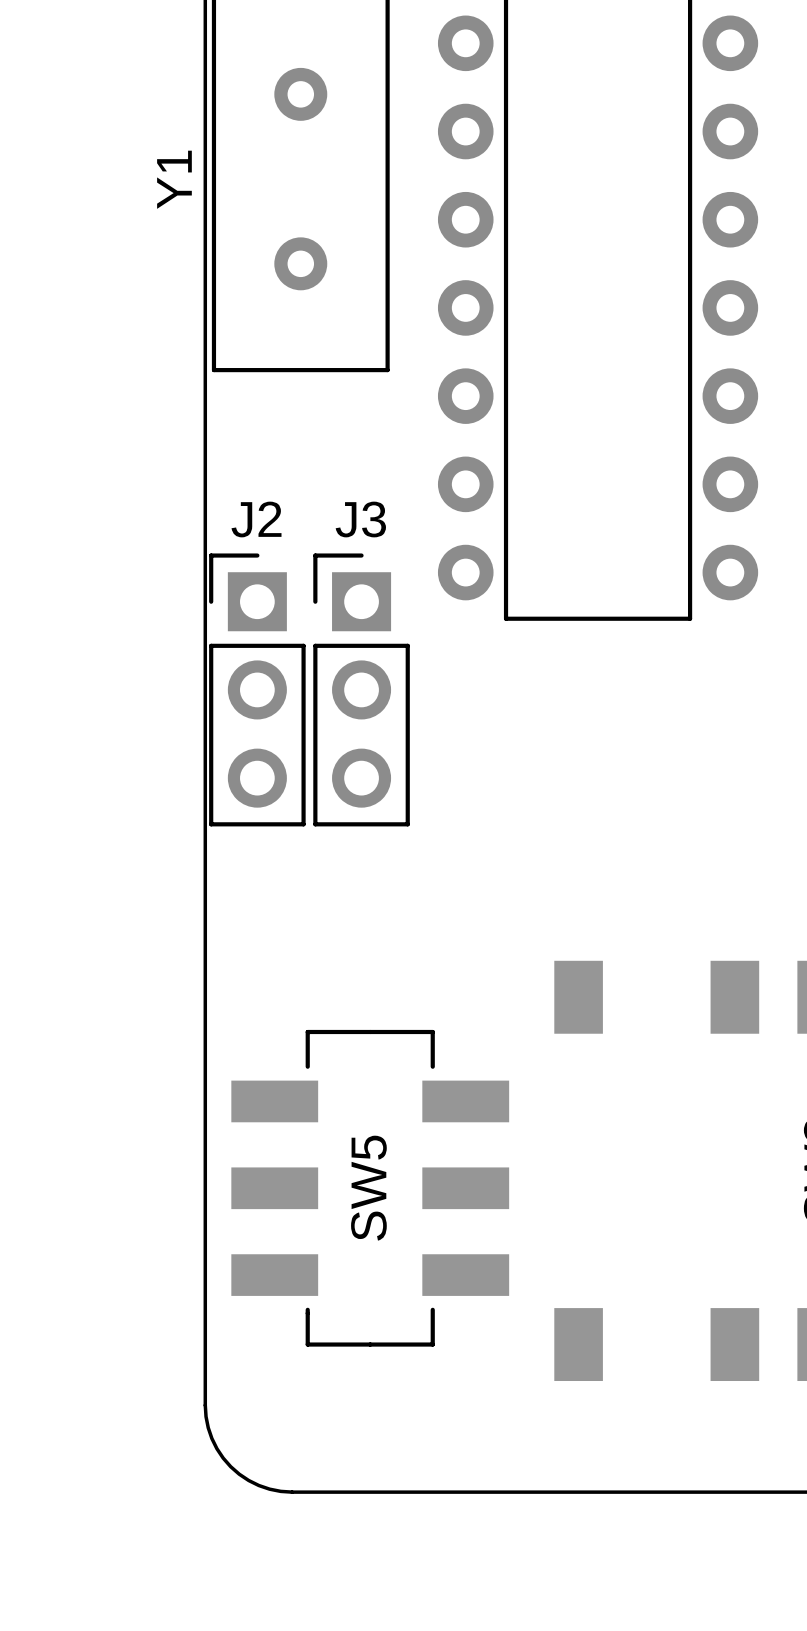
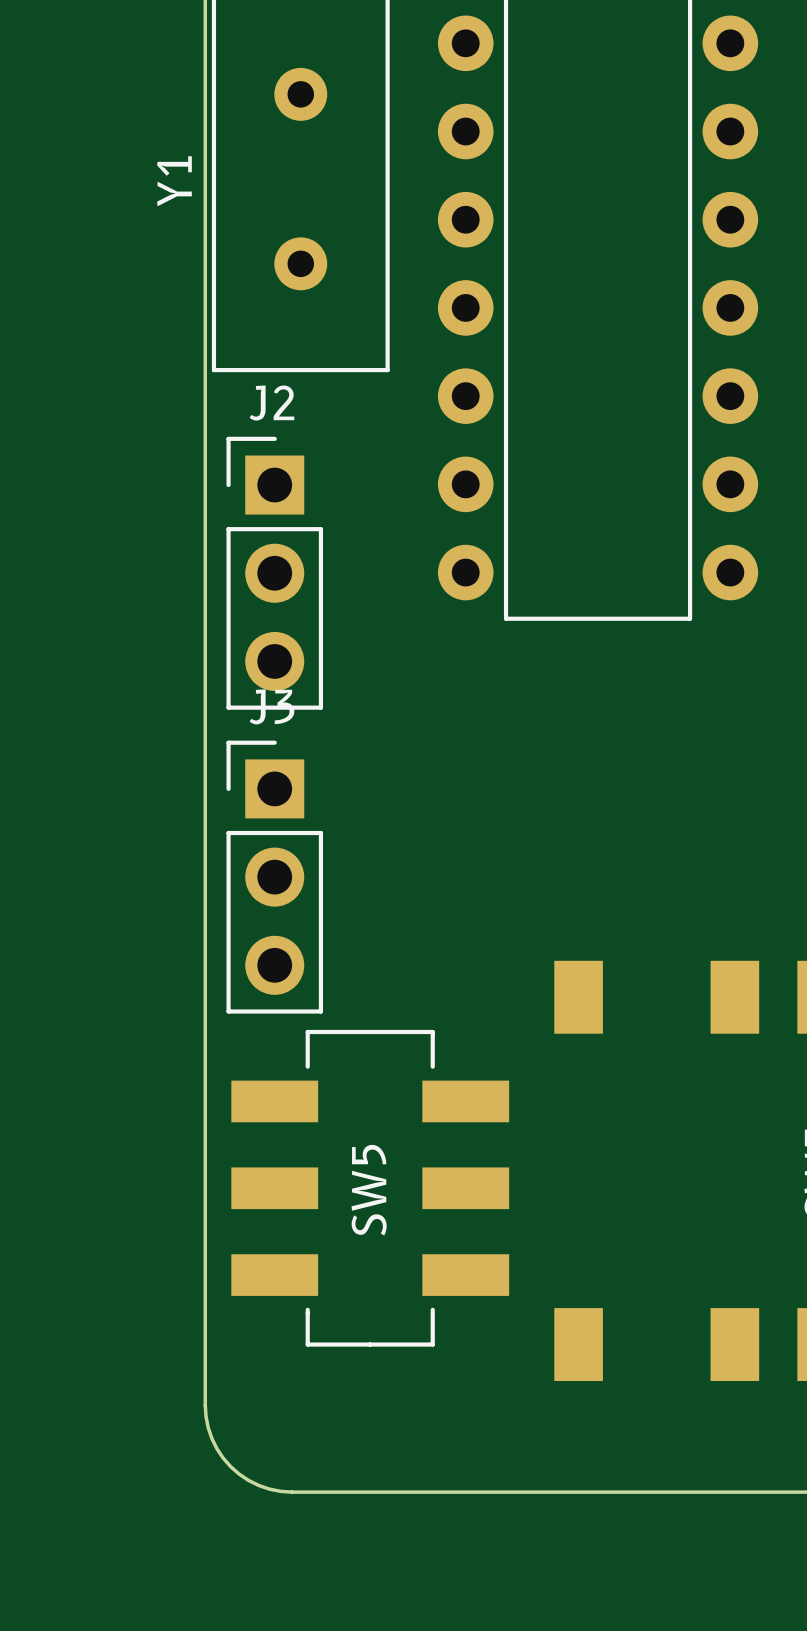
J2 position: (257, 689) -> (274, 573)
J3 position: (361, 689) -> (274, 877)

